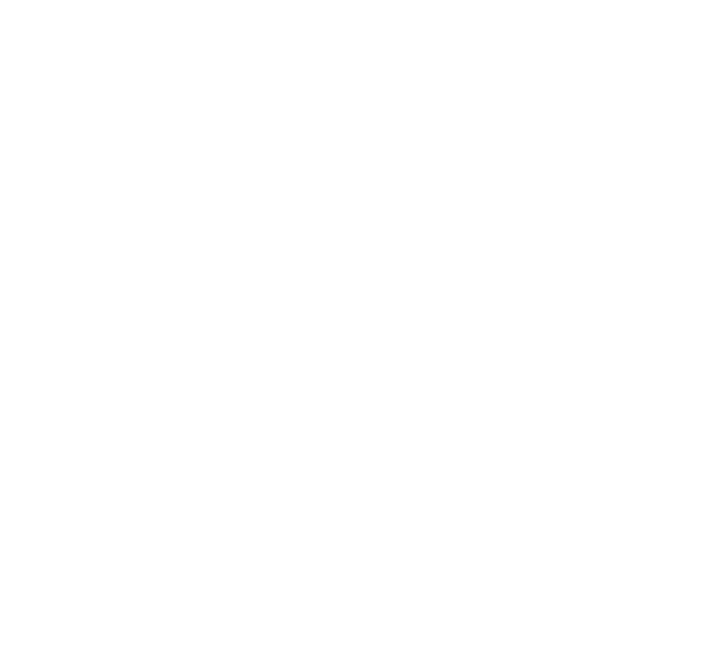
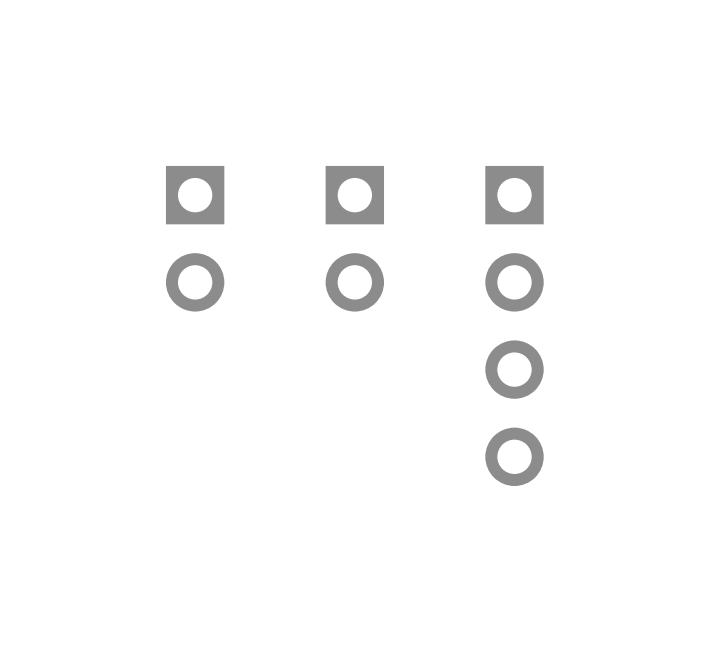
part: none -> (195, 238)
part: none -> (354, 238)
part: none -> (514, 325)

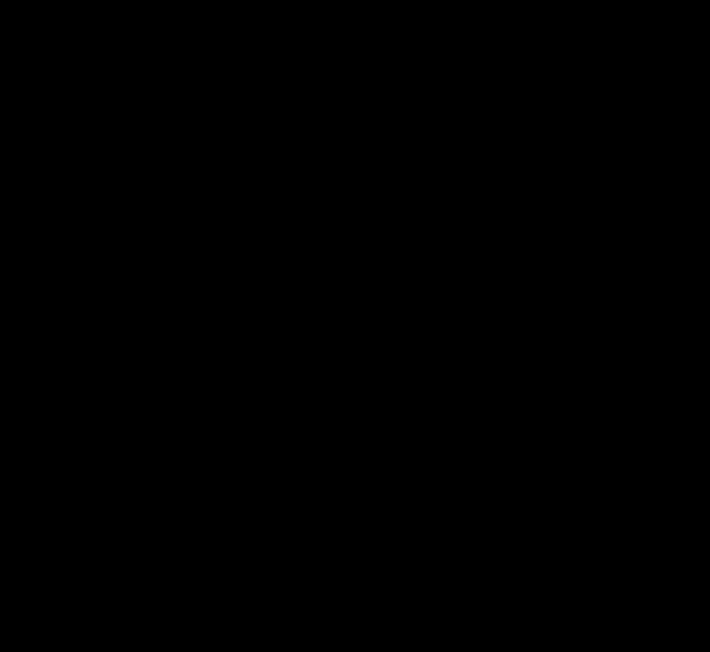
part: (195, 238) -> none
part: (354, 238) -> none
part: (514, 325) -> none

